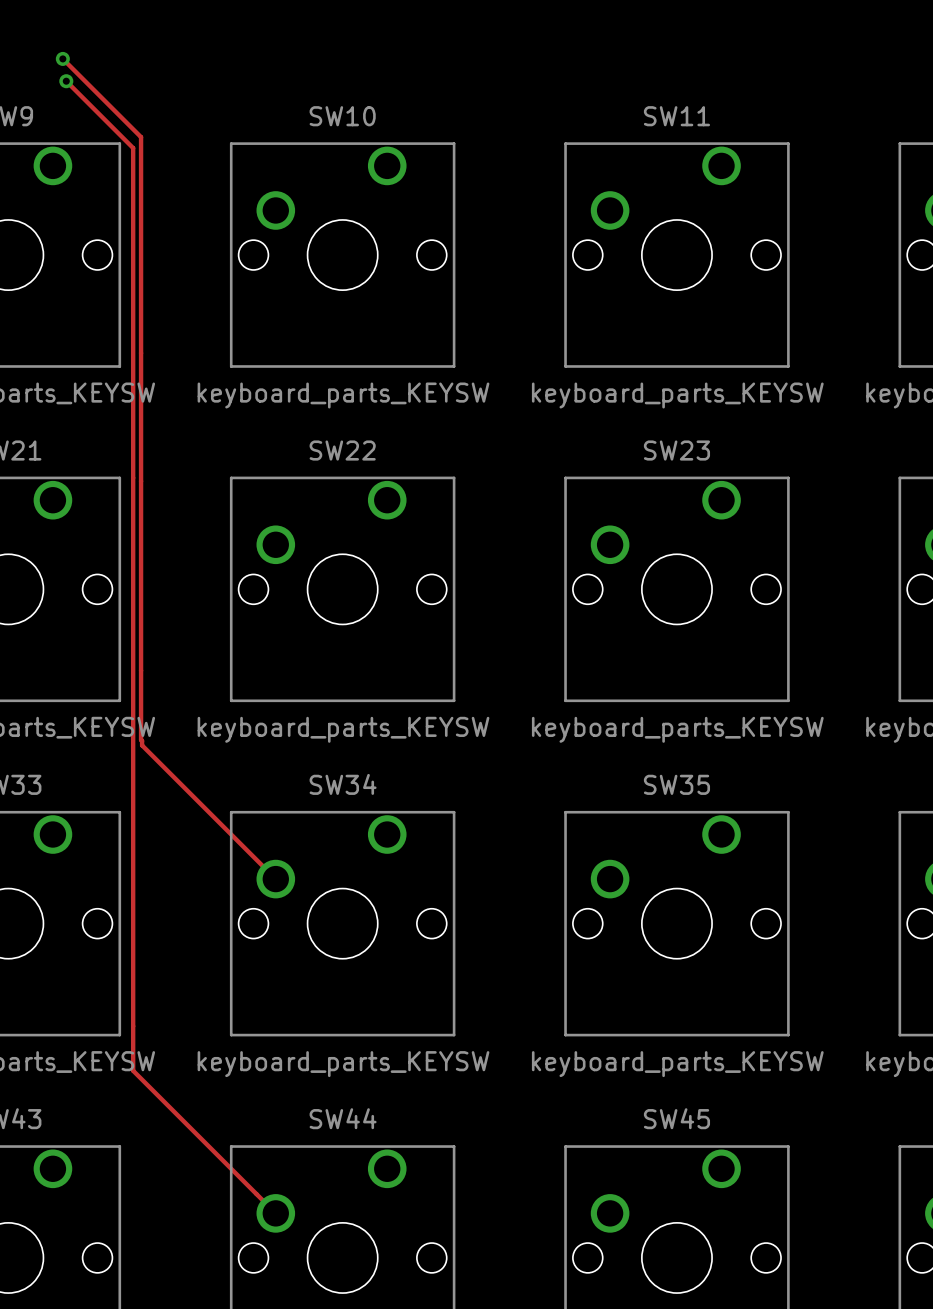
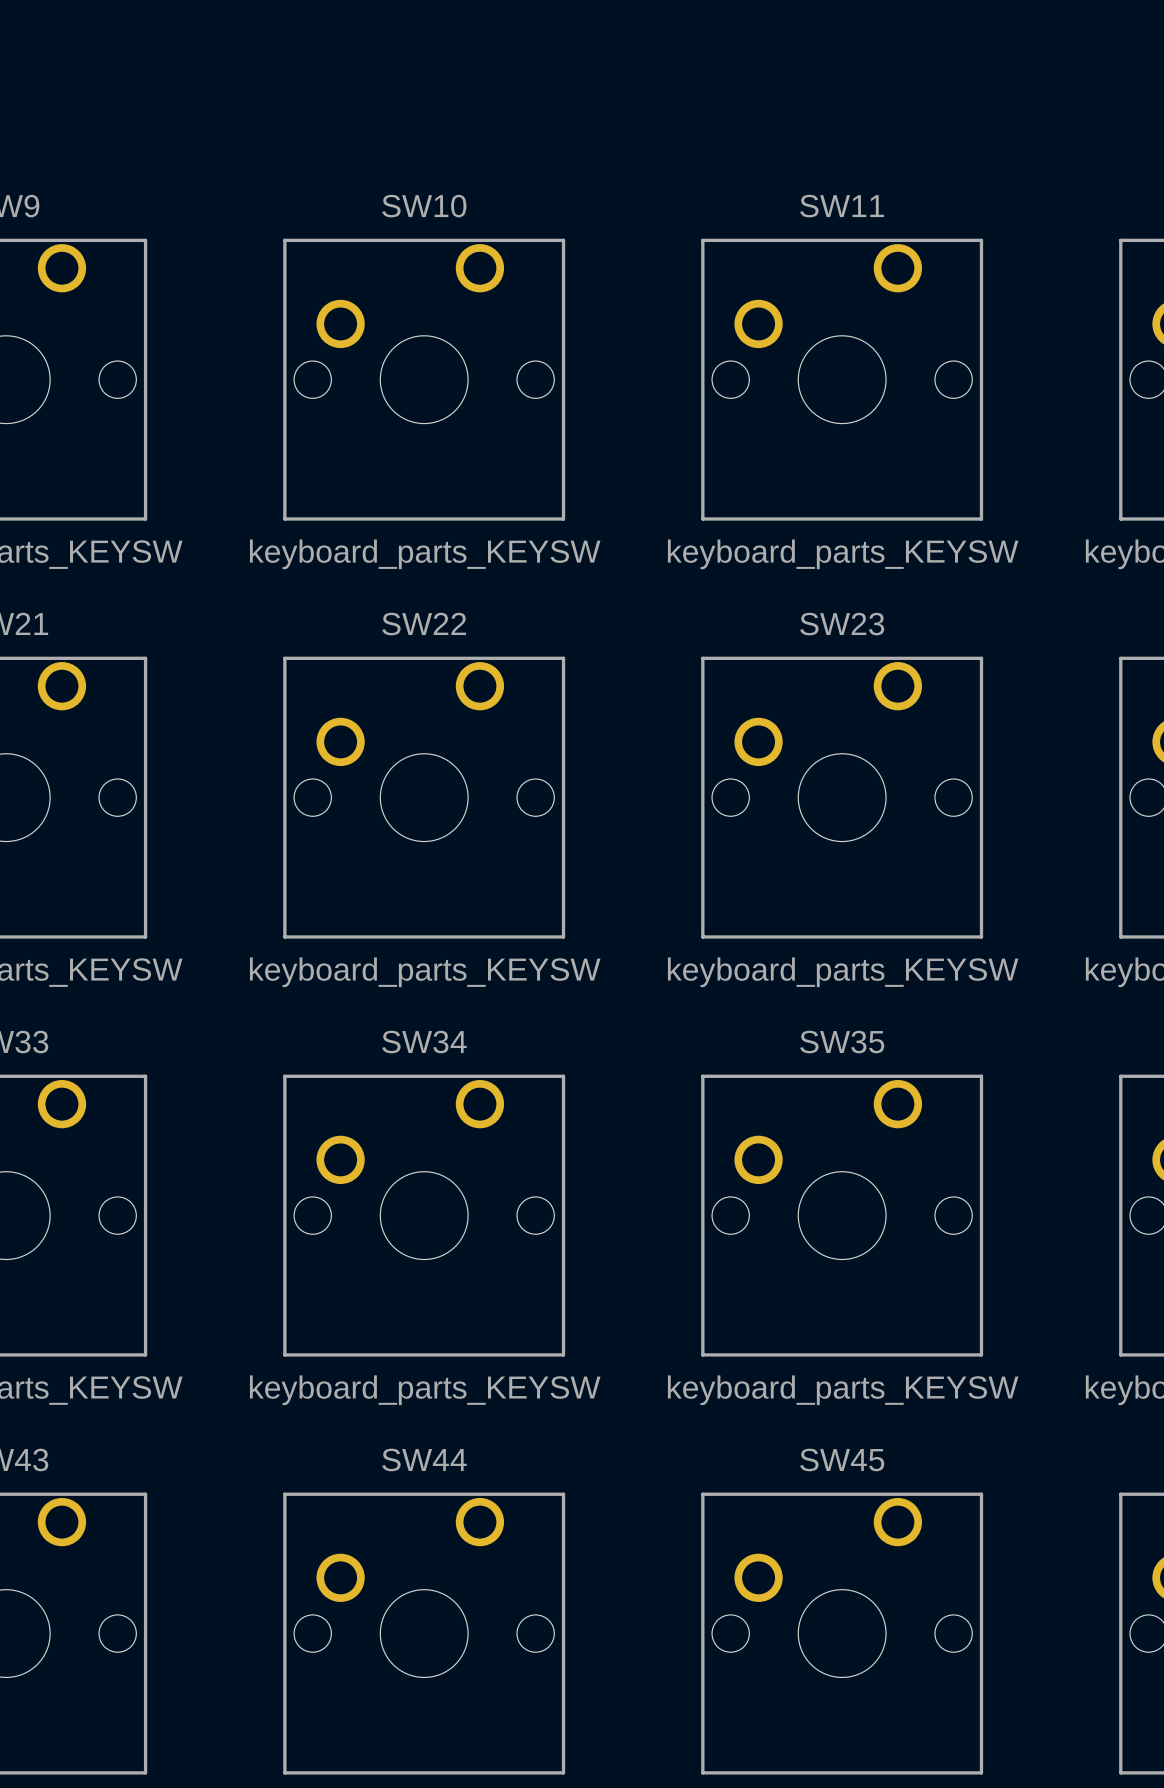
track: (62, 58) (141, 137) (142, 745) (275, 879) -> none
via: (62, 58) -> none
track: (66, 81) (133, 148) (133, 1070) (275, 1213) -> none
via: (66, 81) -> none

